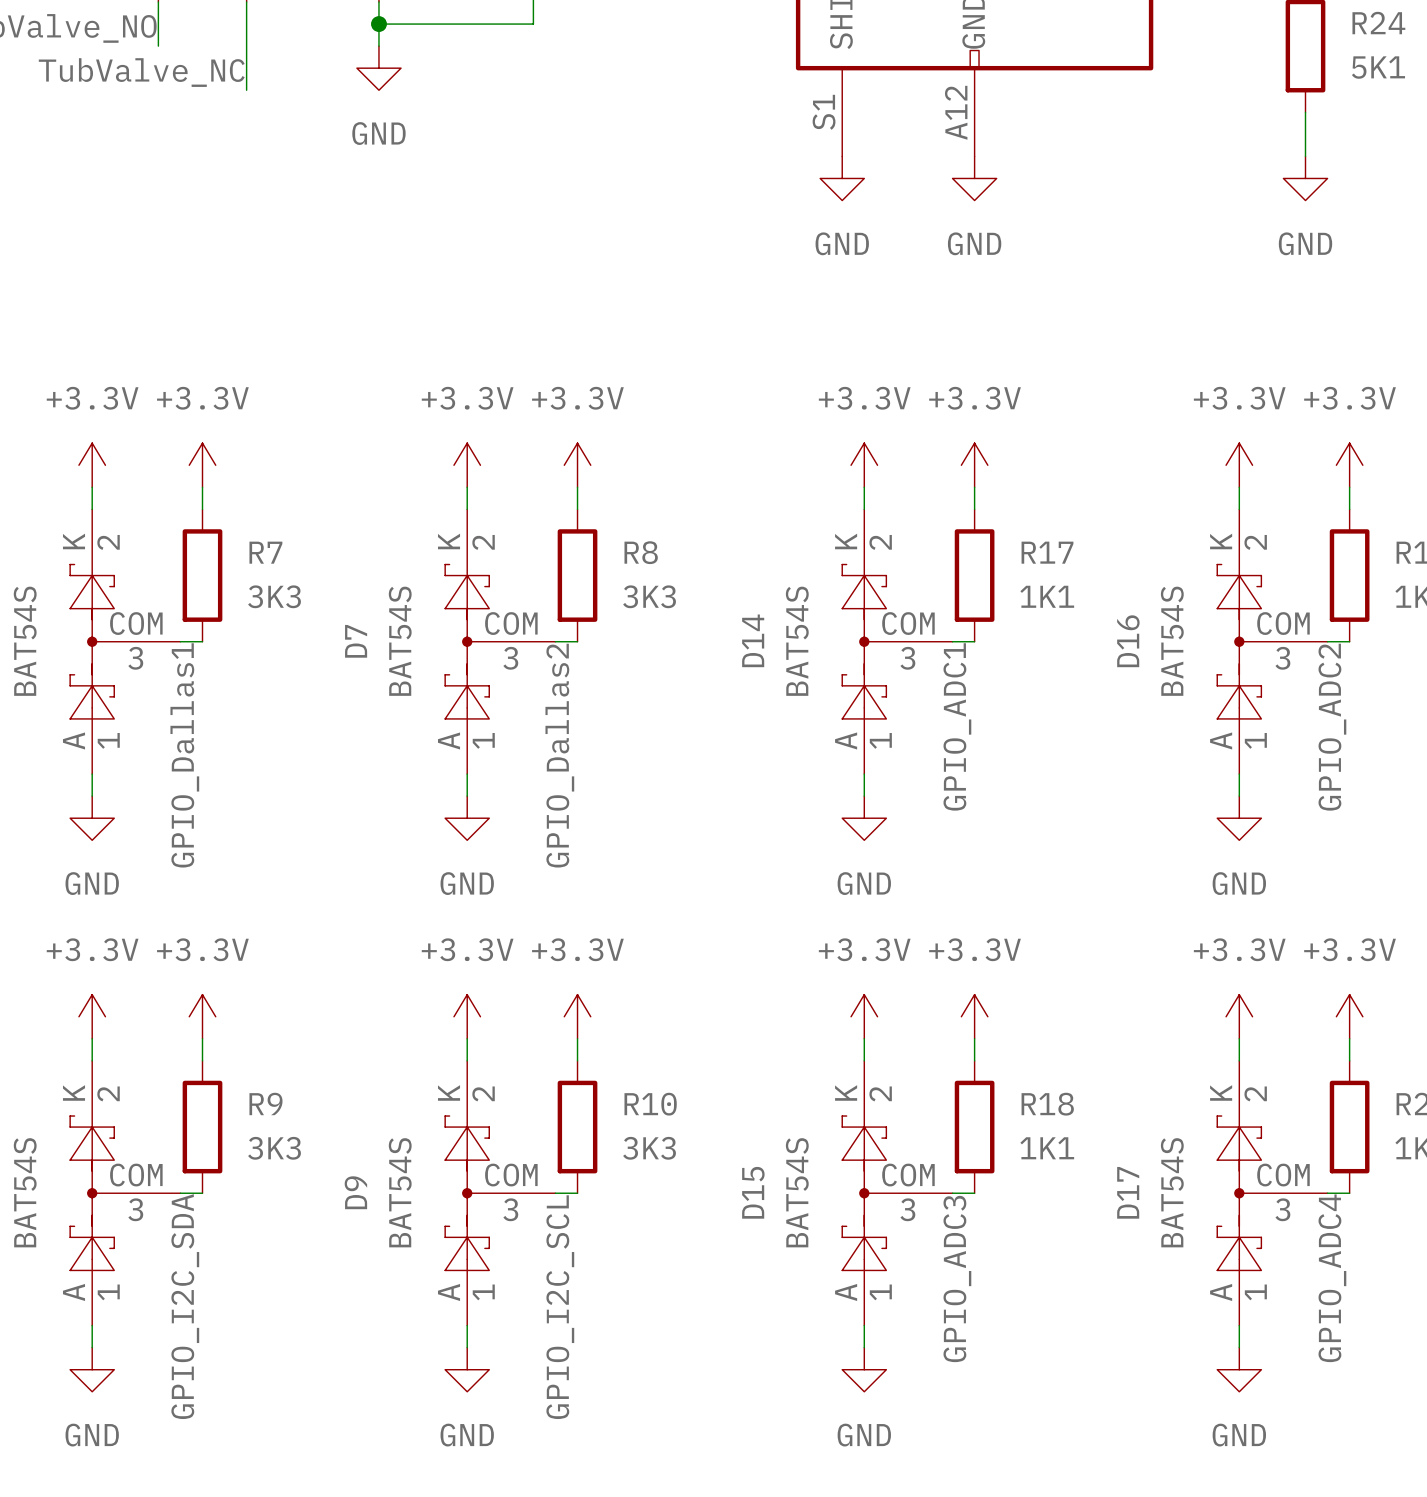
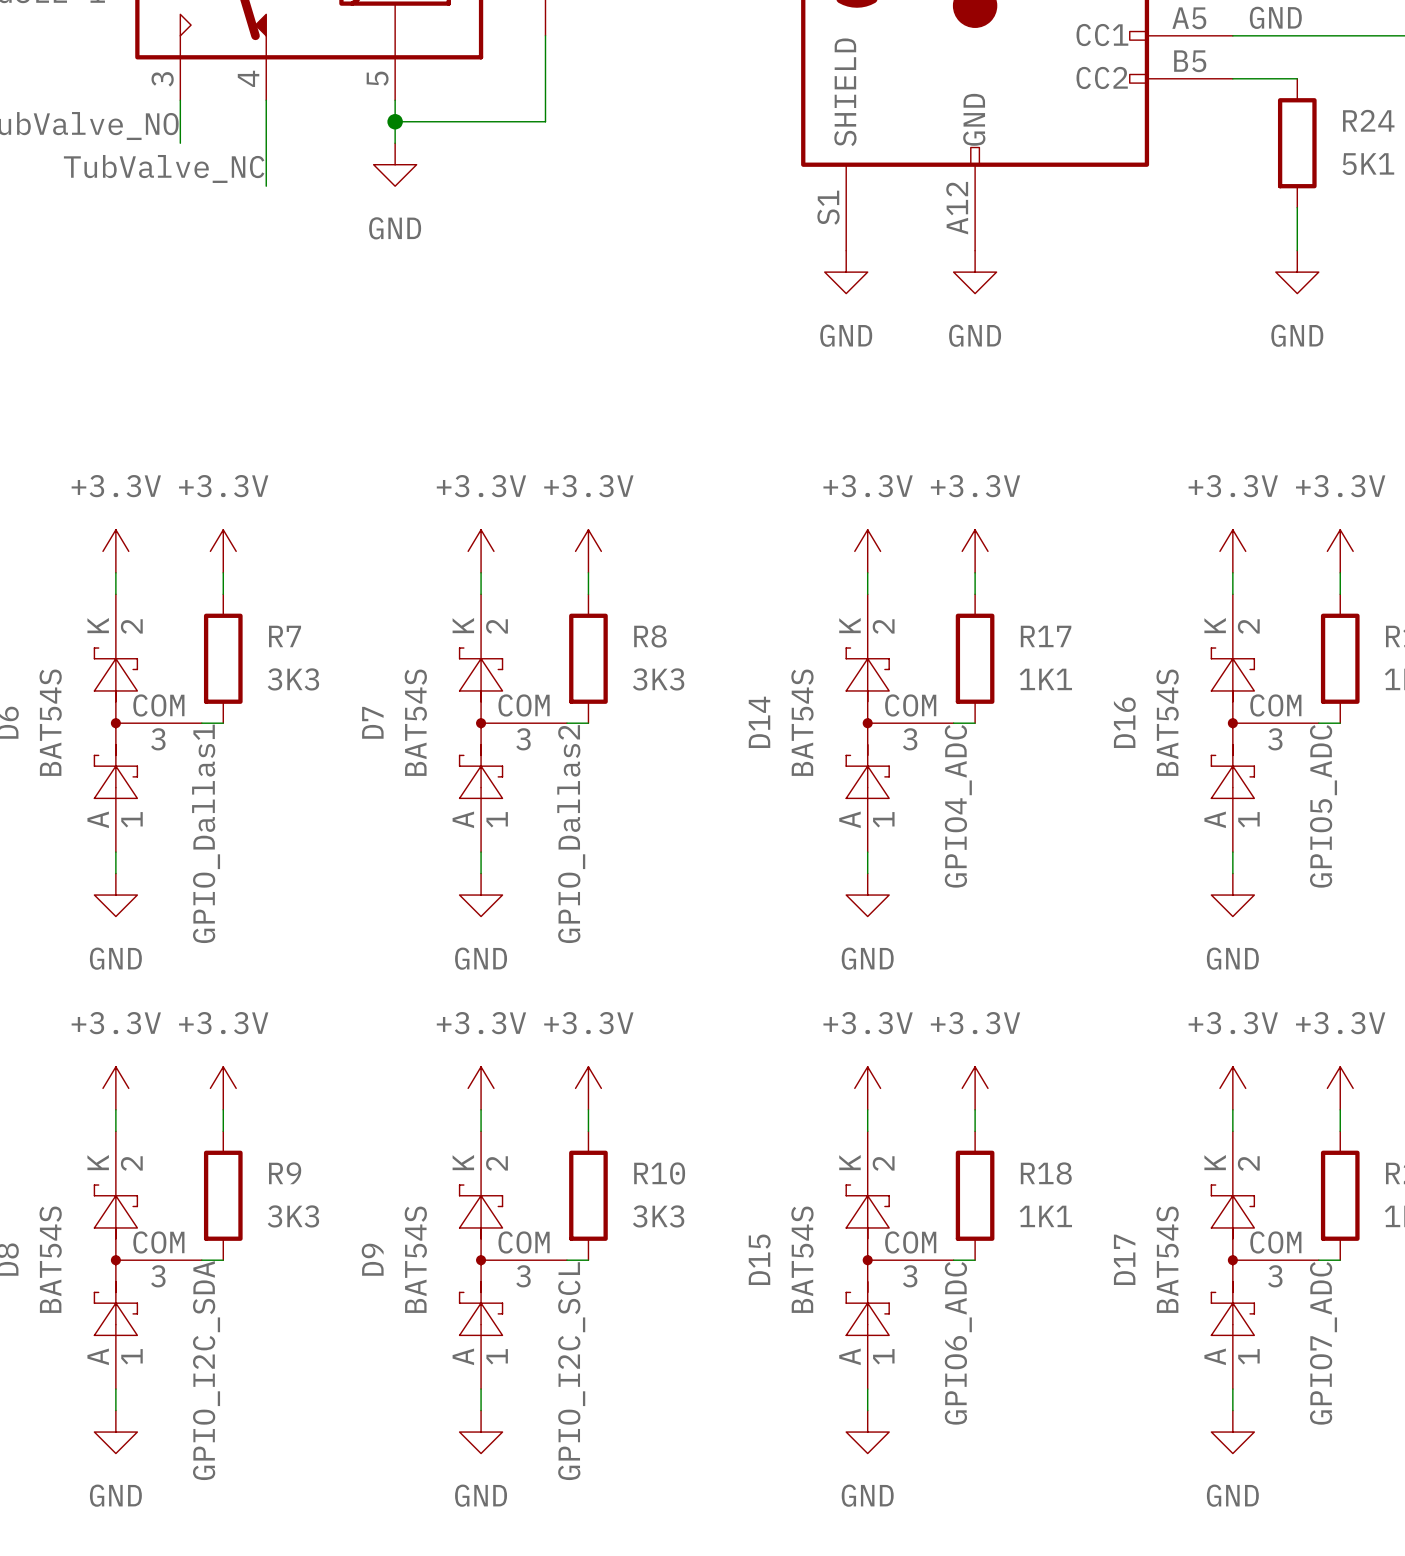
label: GPIO_ADC1 (957, 726) -> GPIO4_ADC (958, 806)
label: GPIO_ADC2 (1332, 727) -> GPIO5_ADC (1323, 806)
label: GPIO_ADC3 (957, 1278) -> GPIO6_ADC (958, 1343)
label: GPIO_ADC4 (1332, 1278) -> GPIO7_ADC (1323, 1343)

